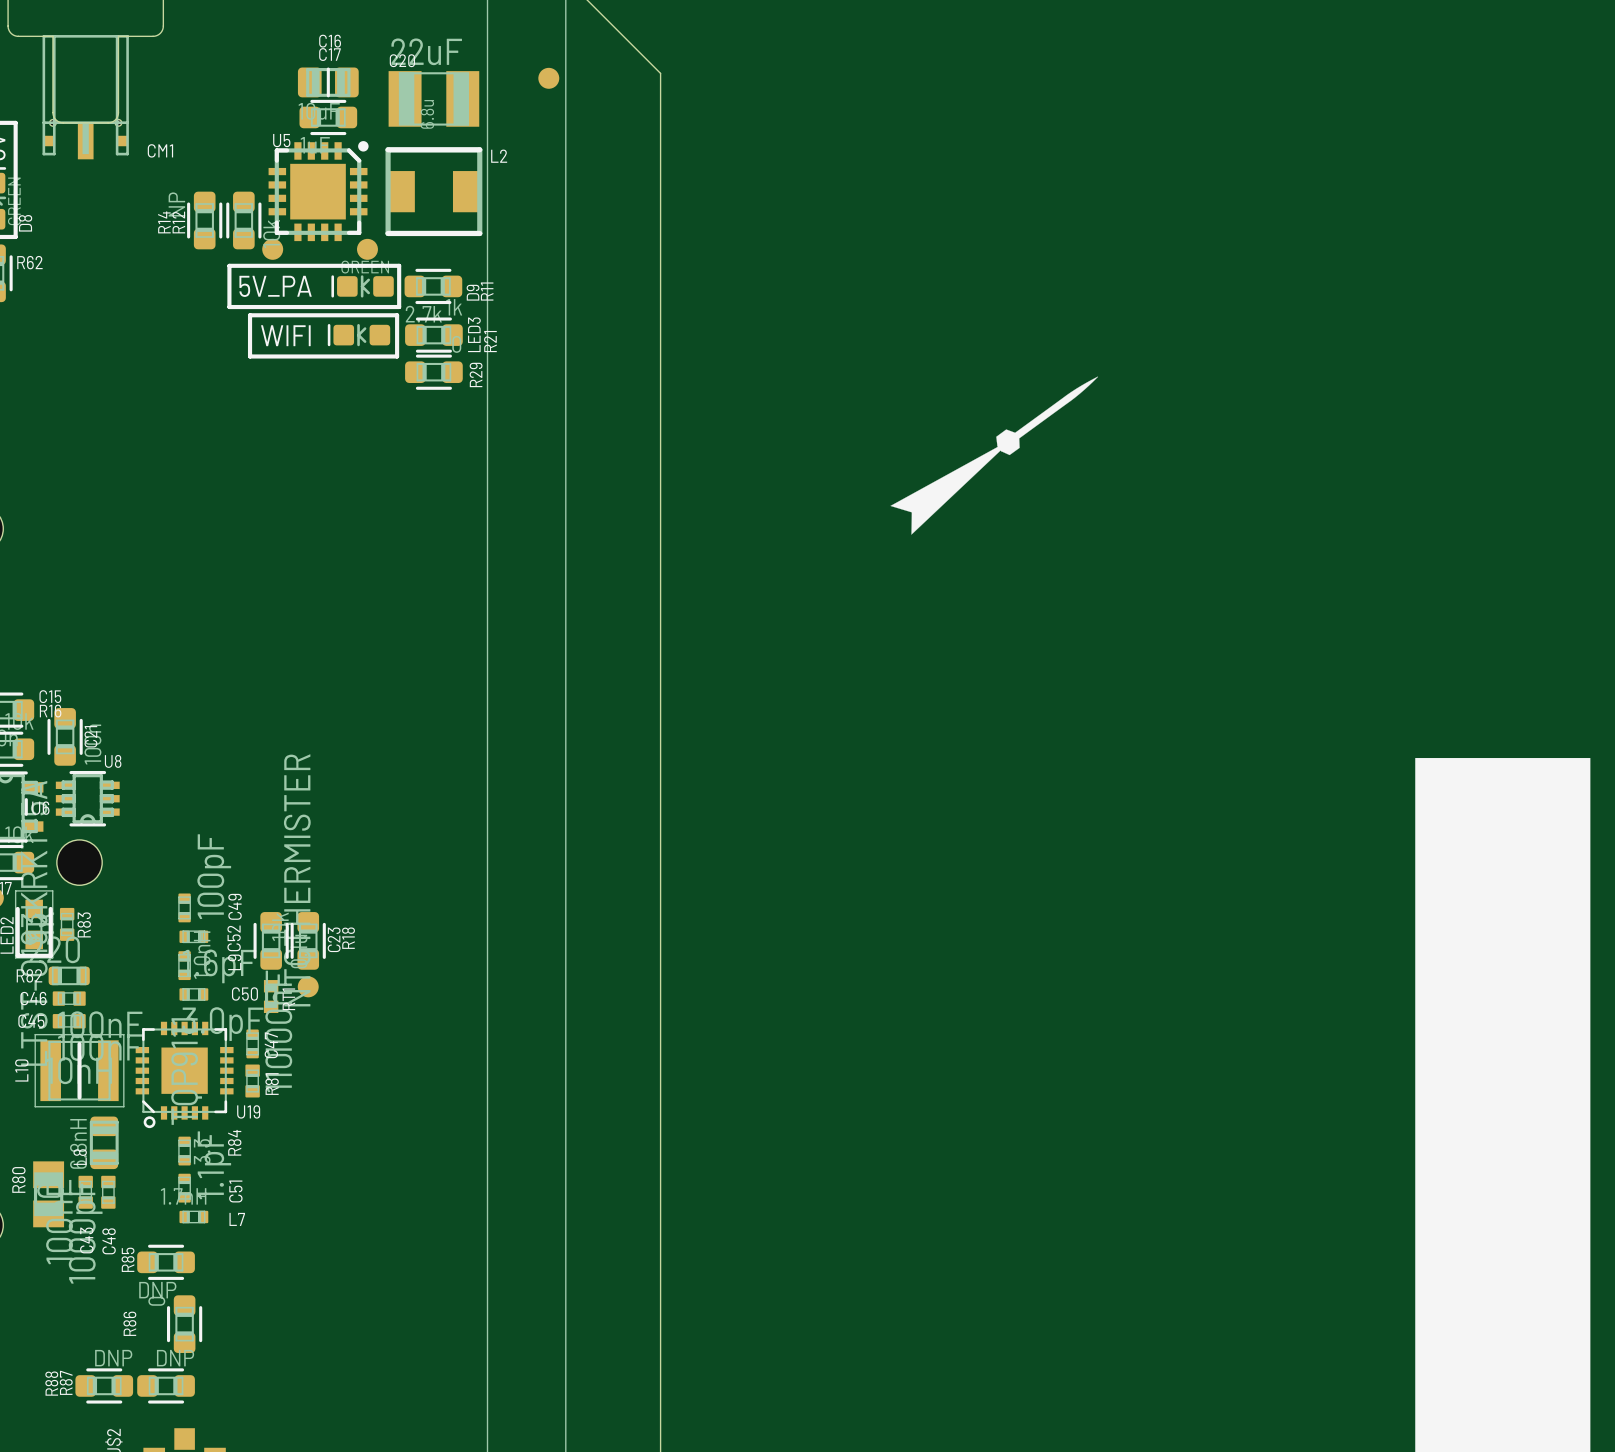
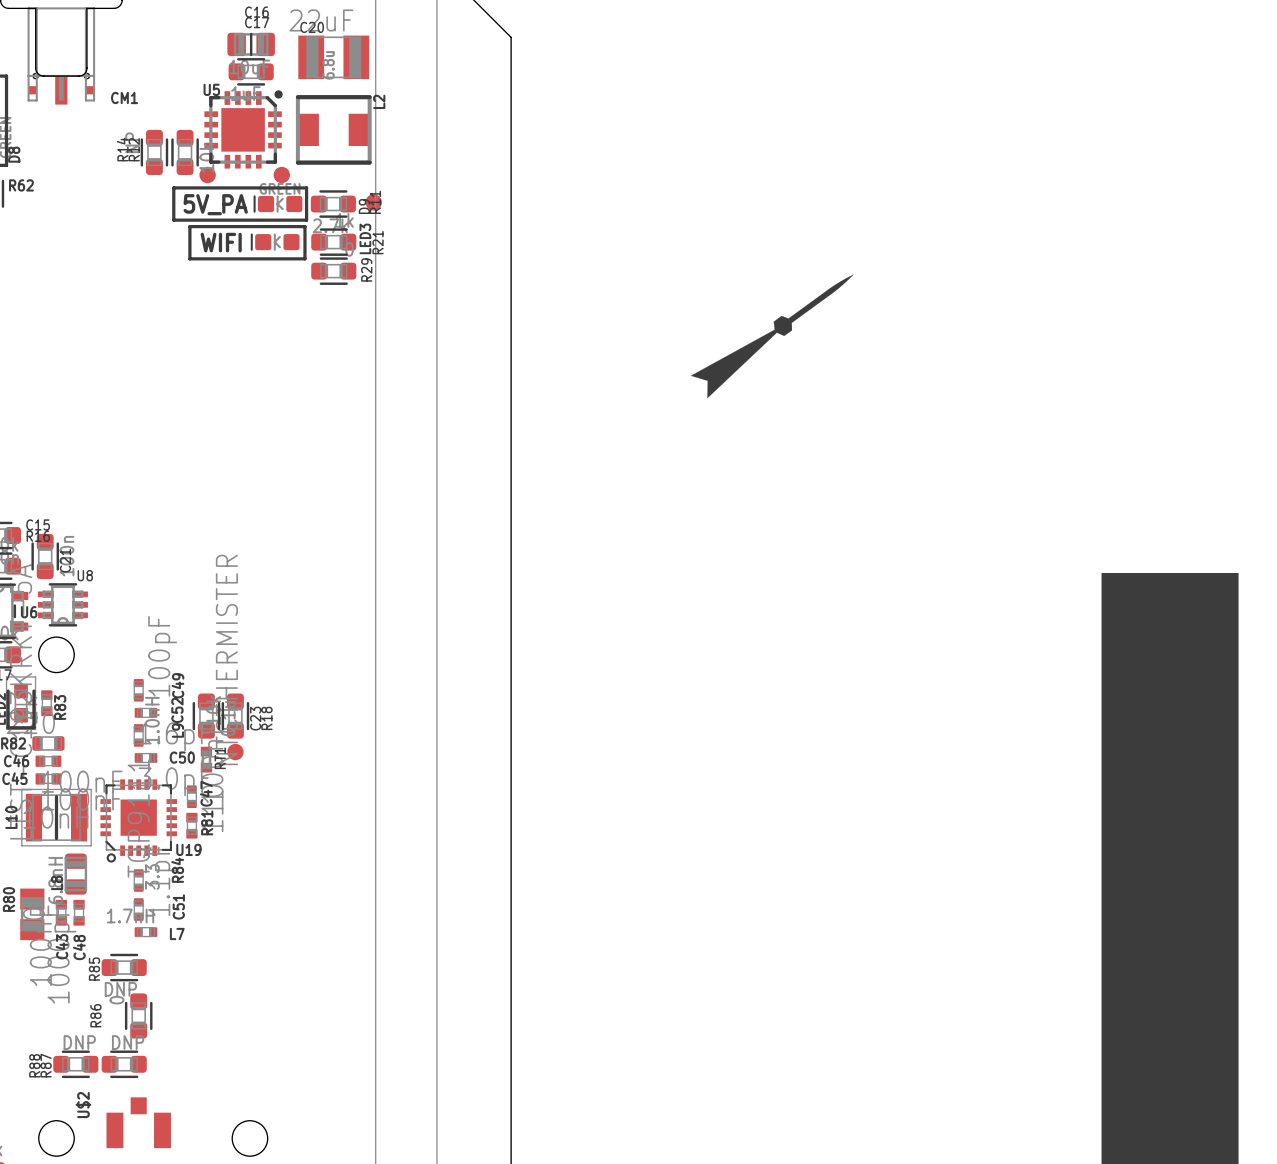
part position: (548, 78) -> (373, 202)
L2 name rotation: 0° (499, 156) -> 90° counterclockwise (379, 101)

